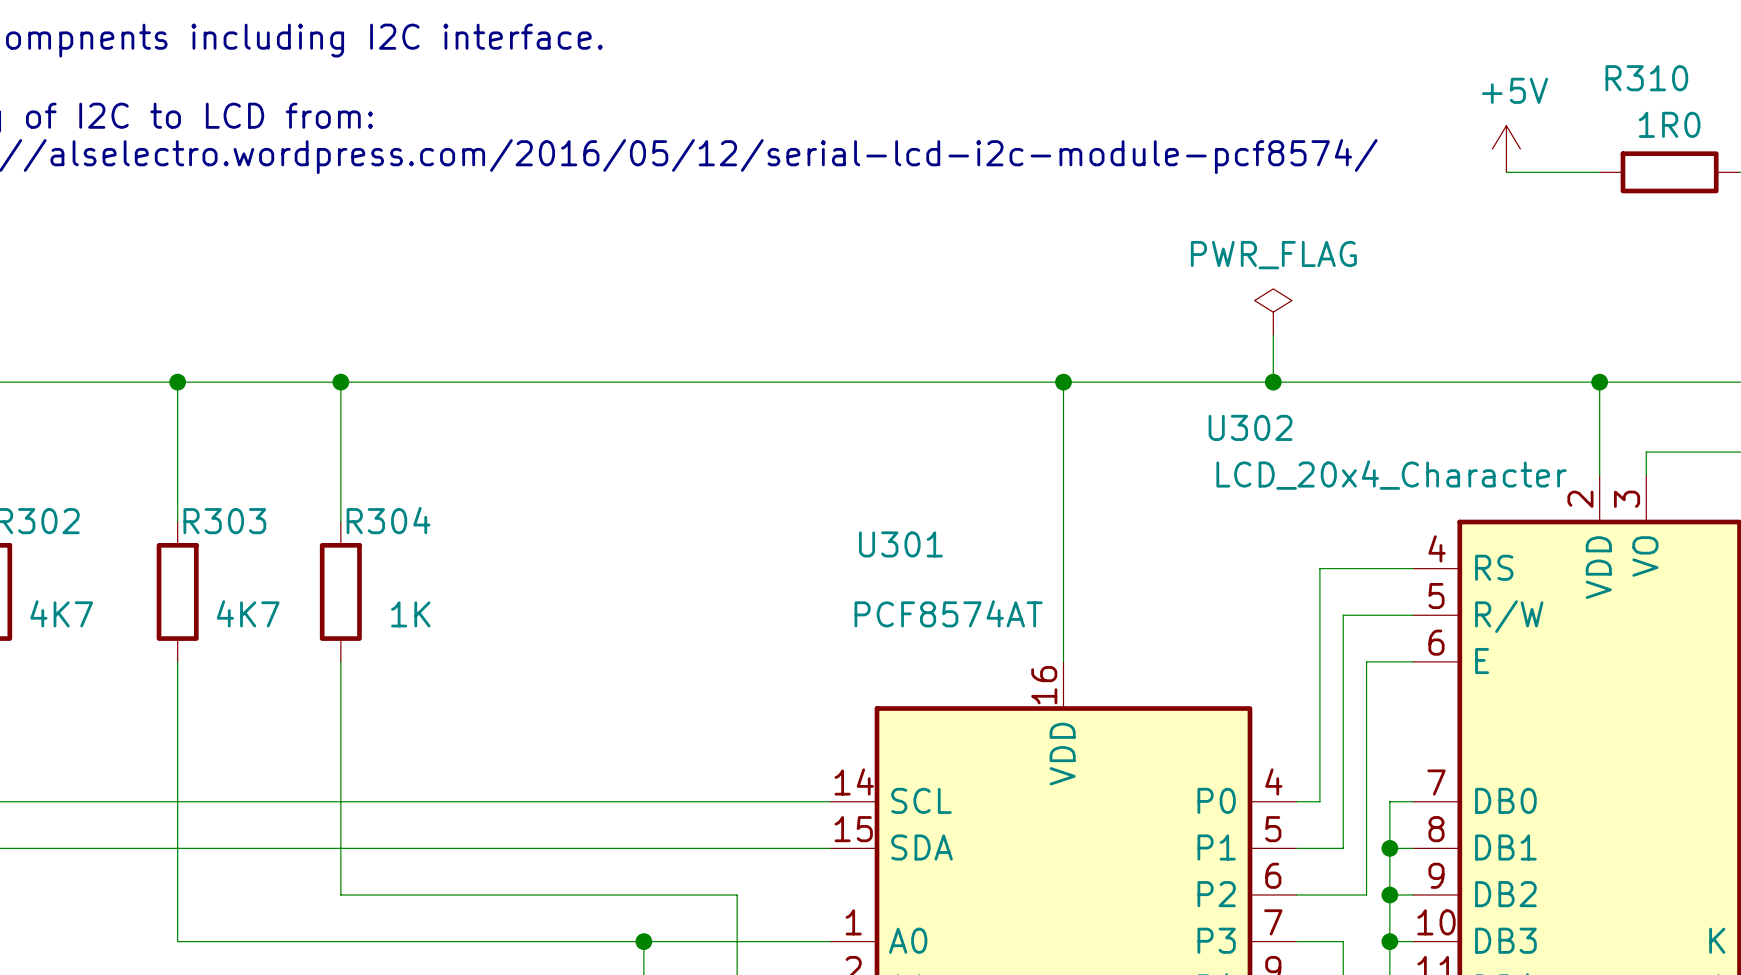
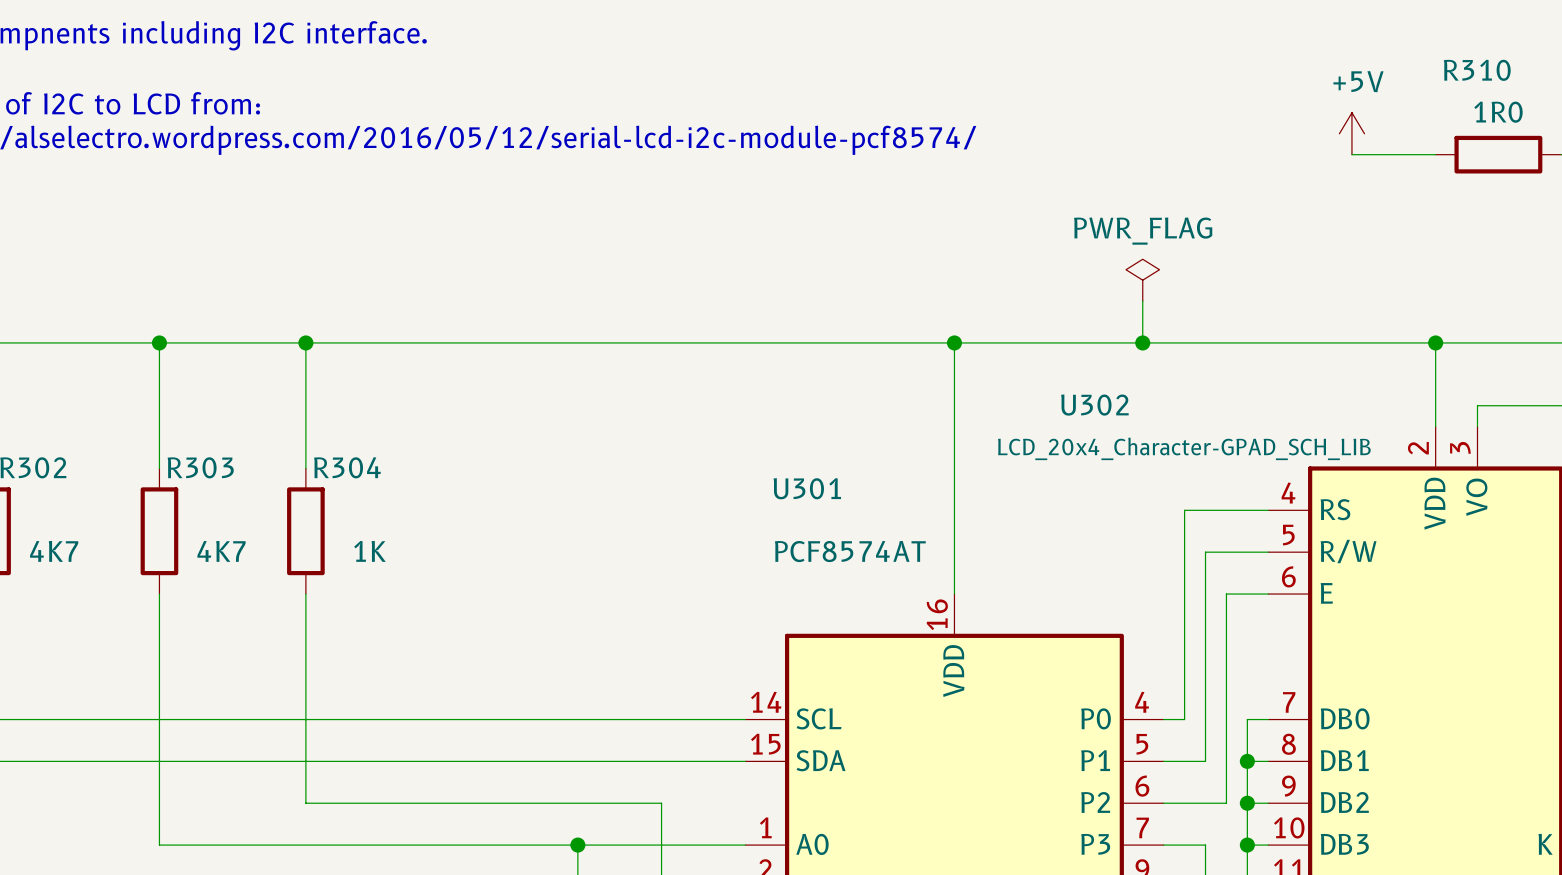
U302 name position: U302 (1250, 427) -> U302 (1094, 405)
U302 value: LCD_20x4_Character (1391, 475) -> LCD_20x4_Character-GPAD_SCH_LIB (1184, 448)

